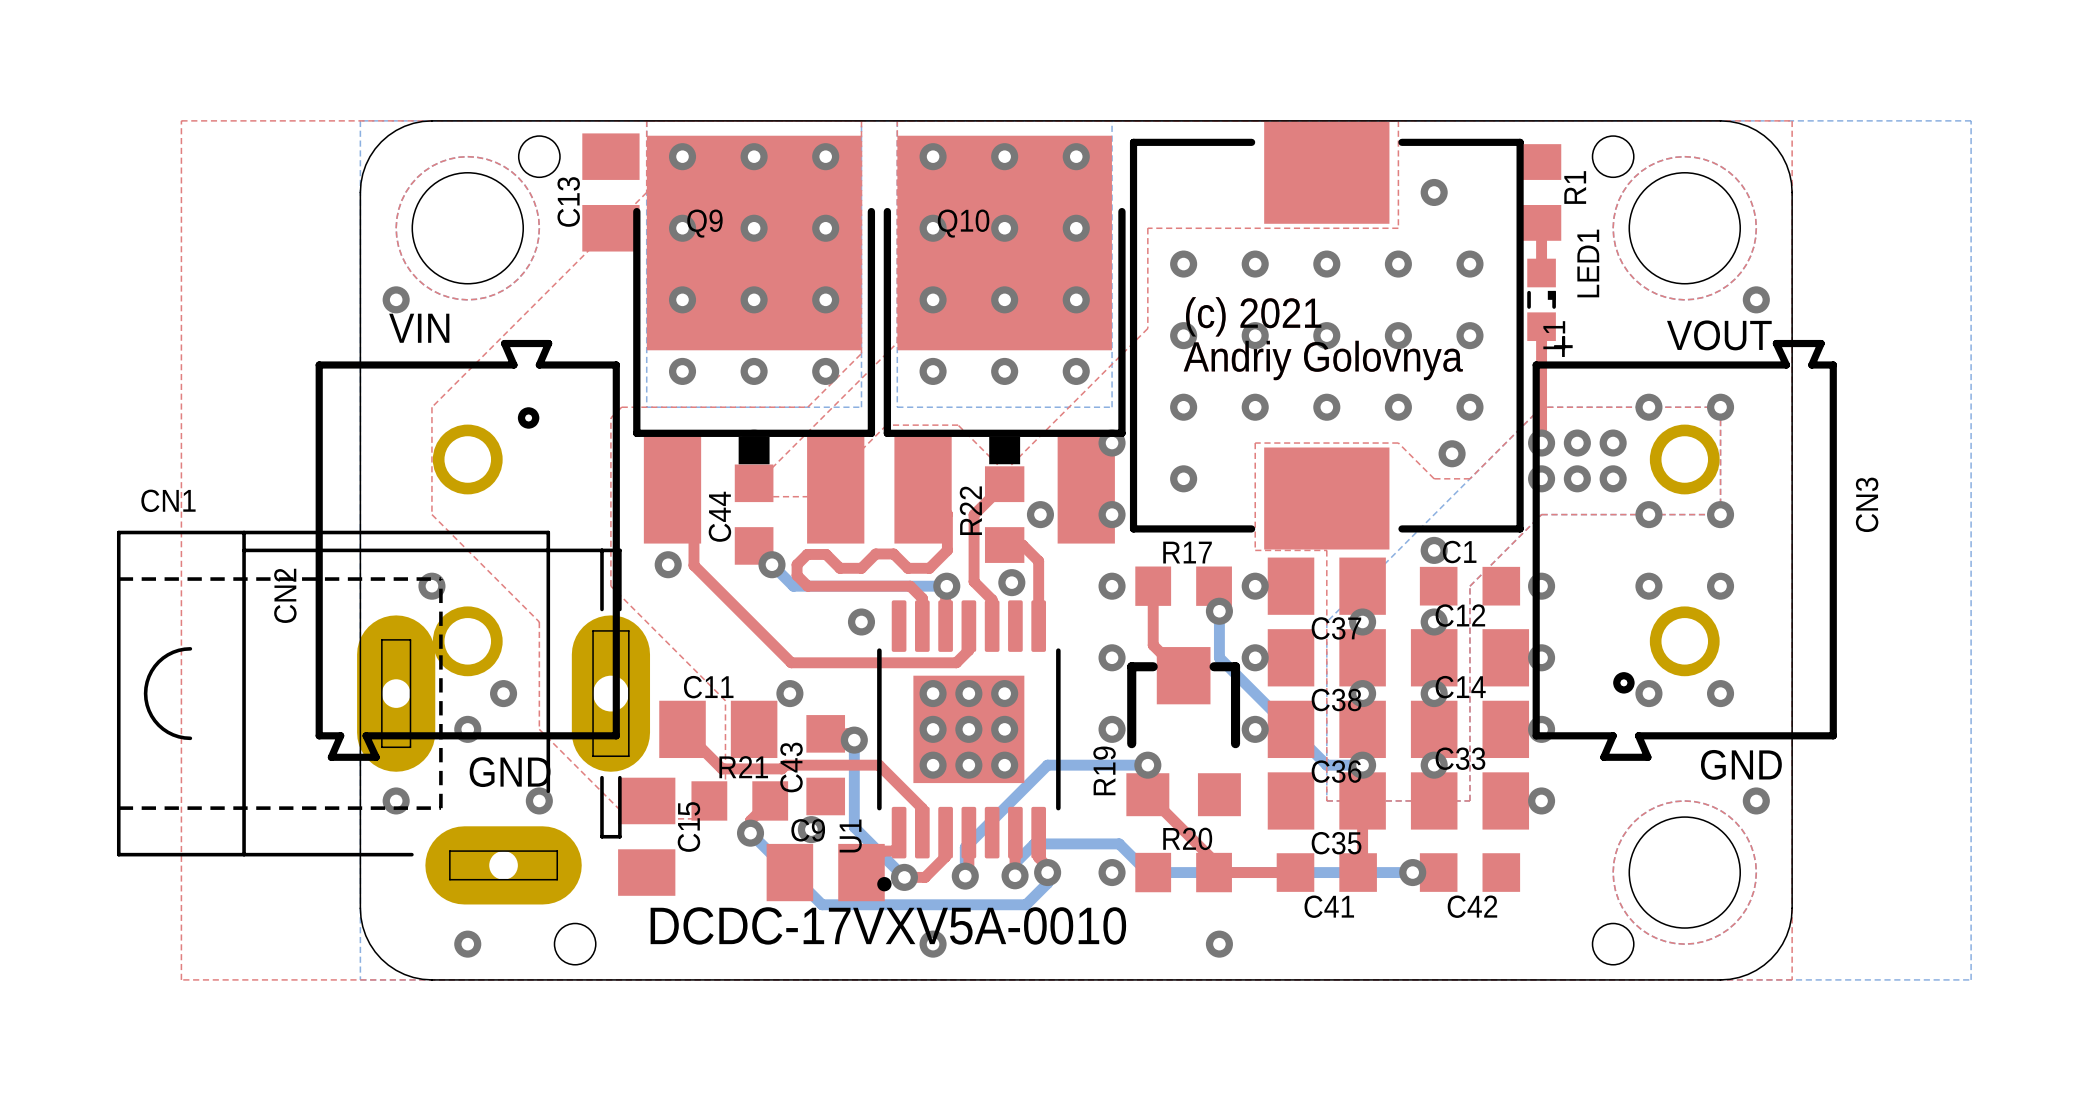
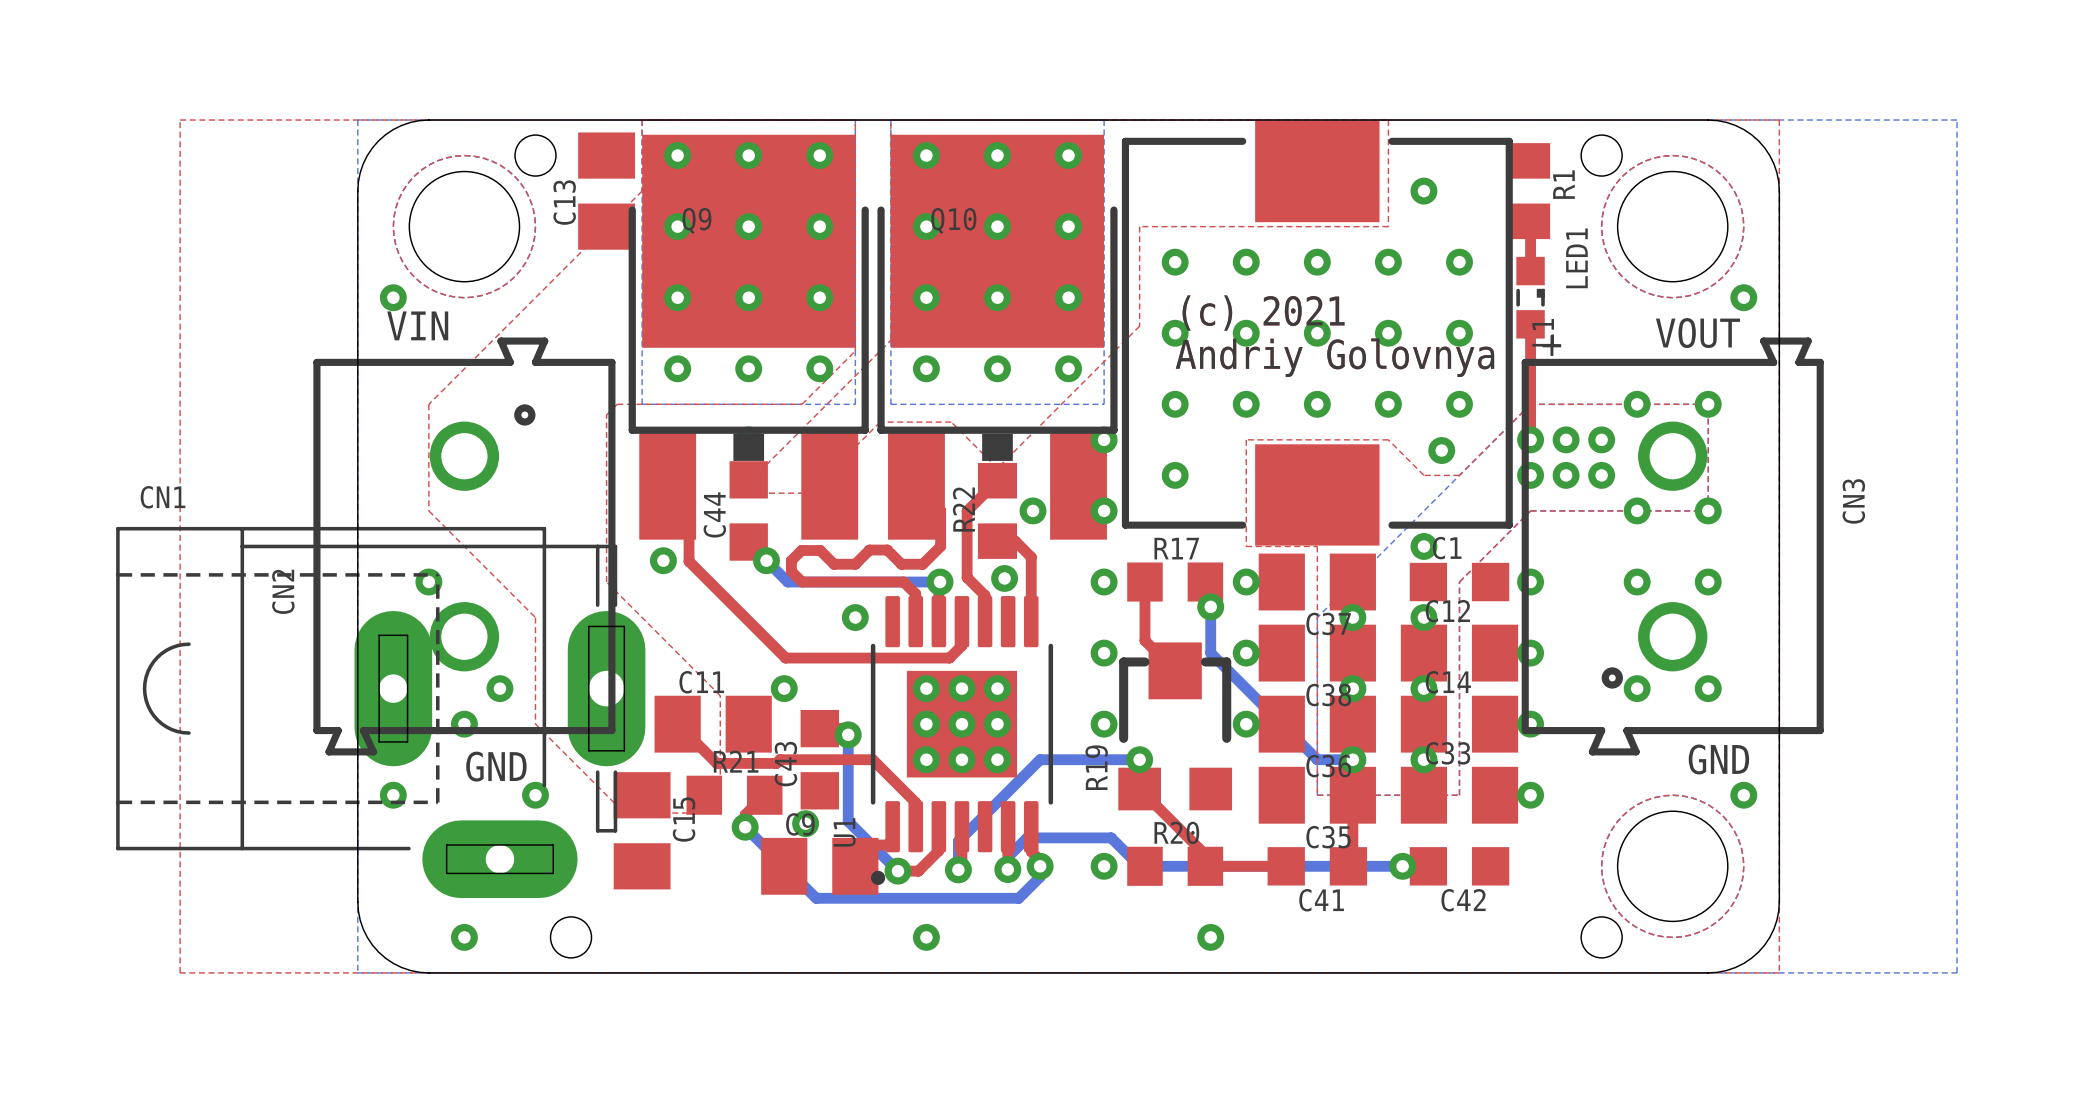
text: DCDC-17VXV5A-0010 (888, 925) -> none

